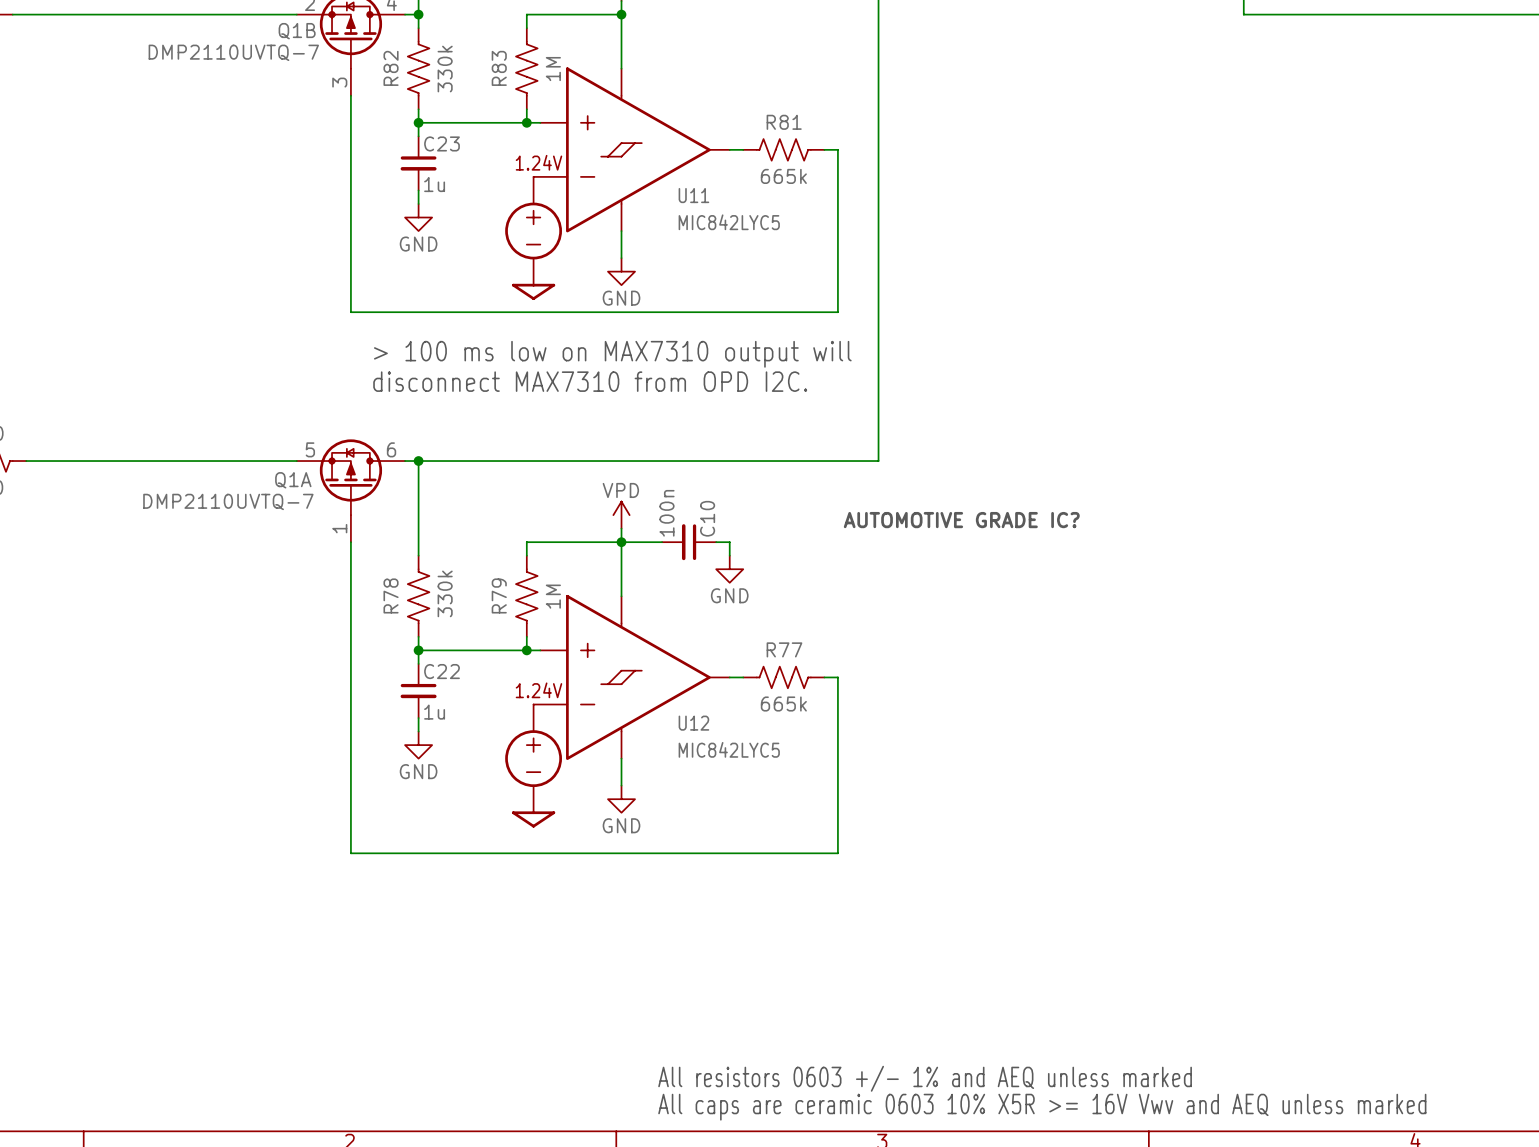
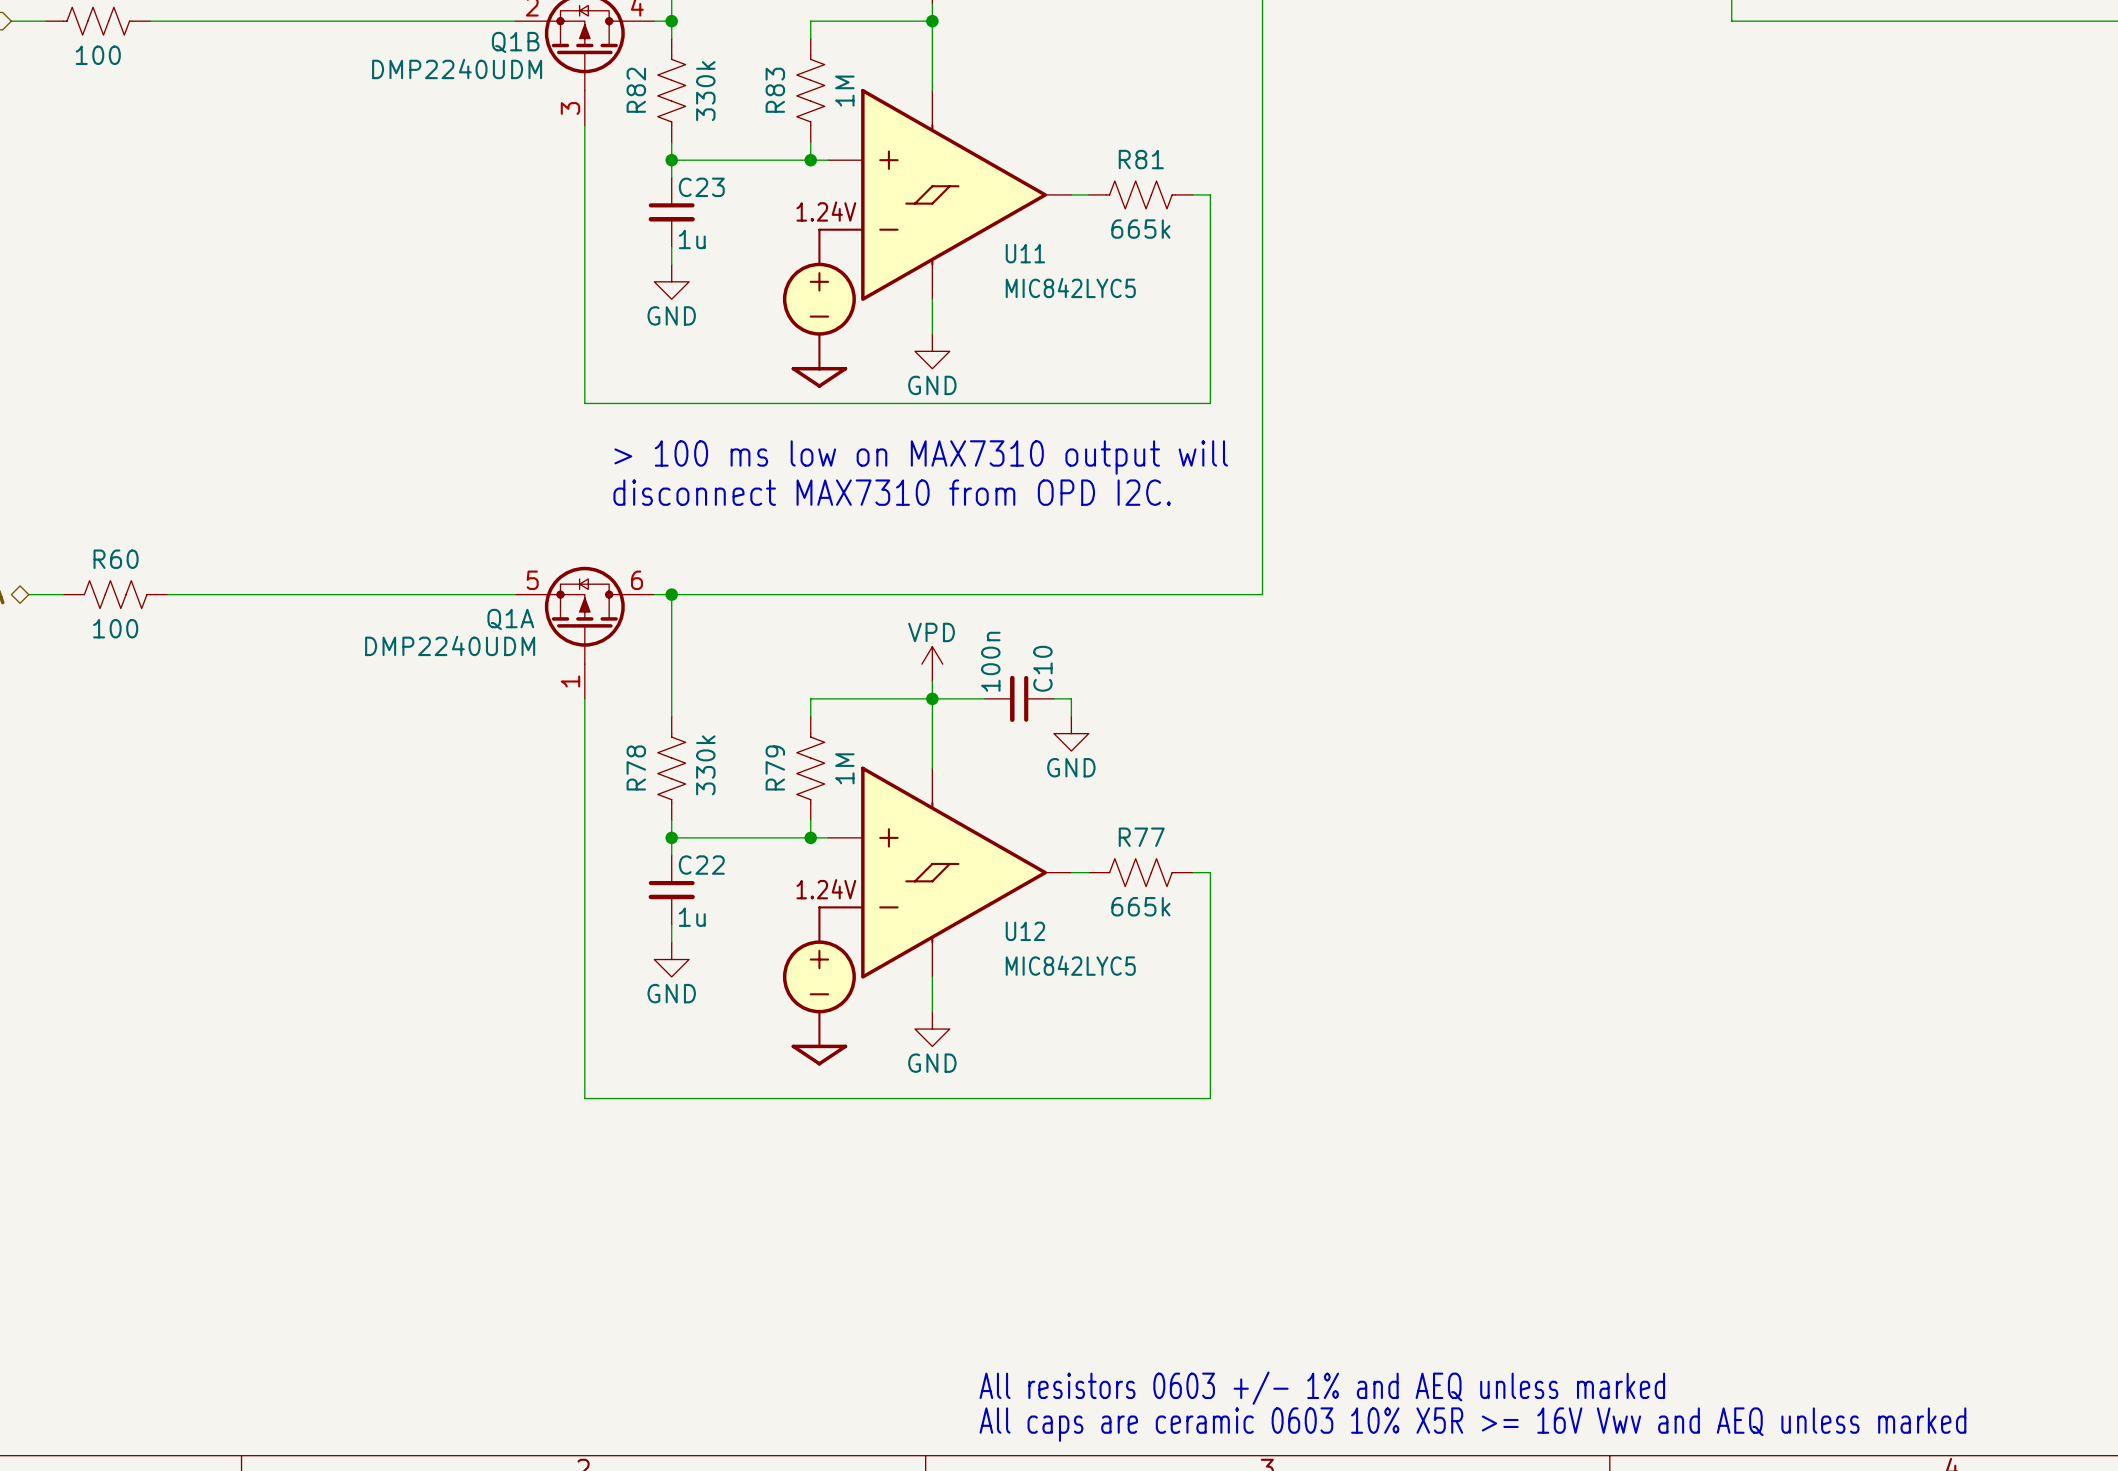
Q1B value: DMP2110UVTQ-7 (233, 52) -> DMP2240UDM (457, 69)
Q1A value: DMP2110UVTQ-7 (228, 501) -> DMP2240UDM (450, 645)
text: AUTOMOTIVE GRADE IC? (961, 520) -> none

